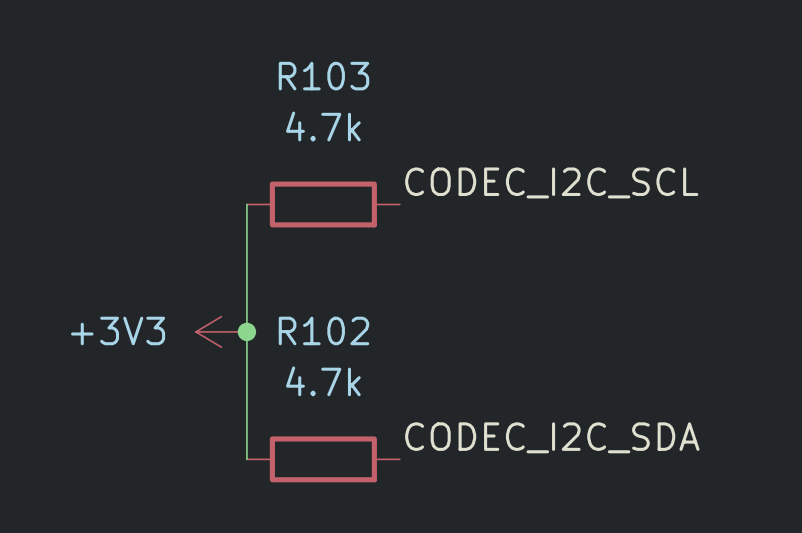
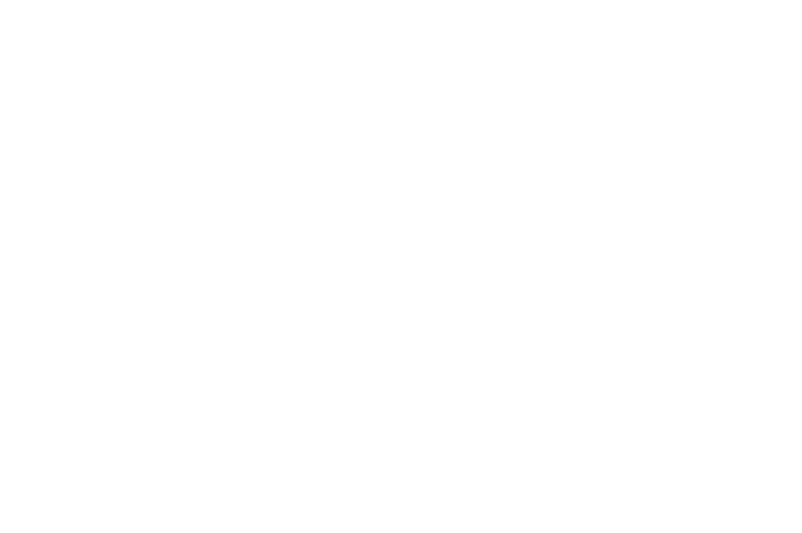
label: CODEC_I2C_SCL (551, 182) -> none
wire: (246, 204) (246, 459) -> none
R103: 4.7k (323, 204) -> none
power symbol: +3V3 (221, 331) -> none
junction: (246, 331) -> none
label: CODEC_I2C_SDA (552, 437) -> none
R102: 4.7k (323, 459) -> none

